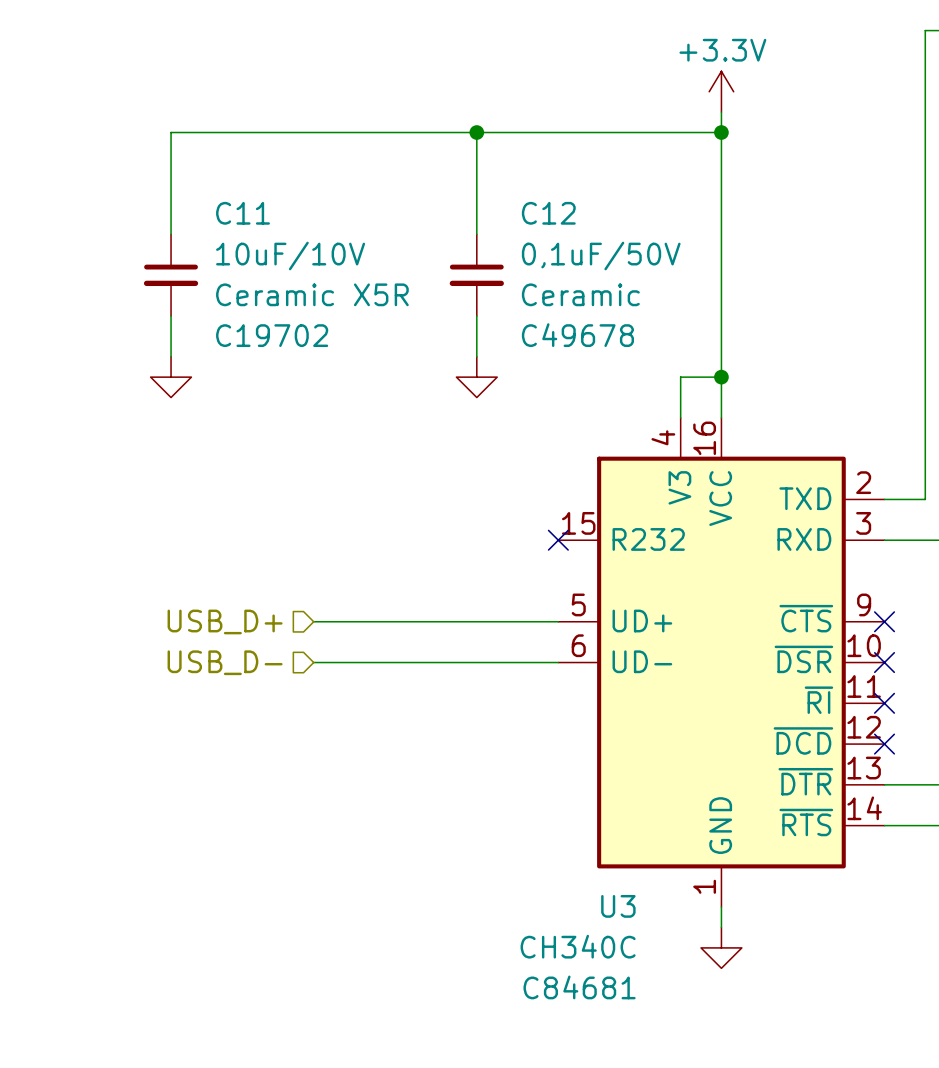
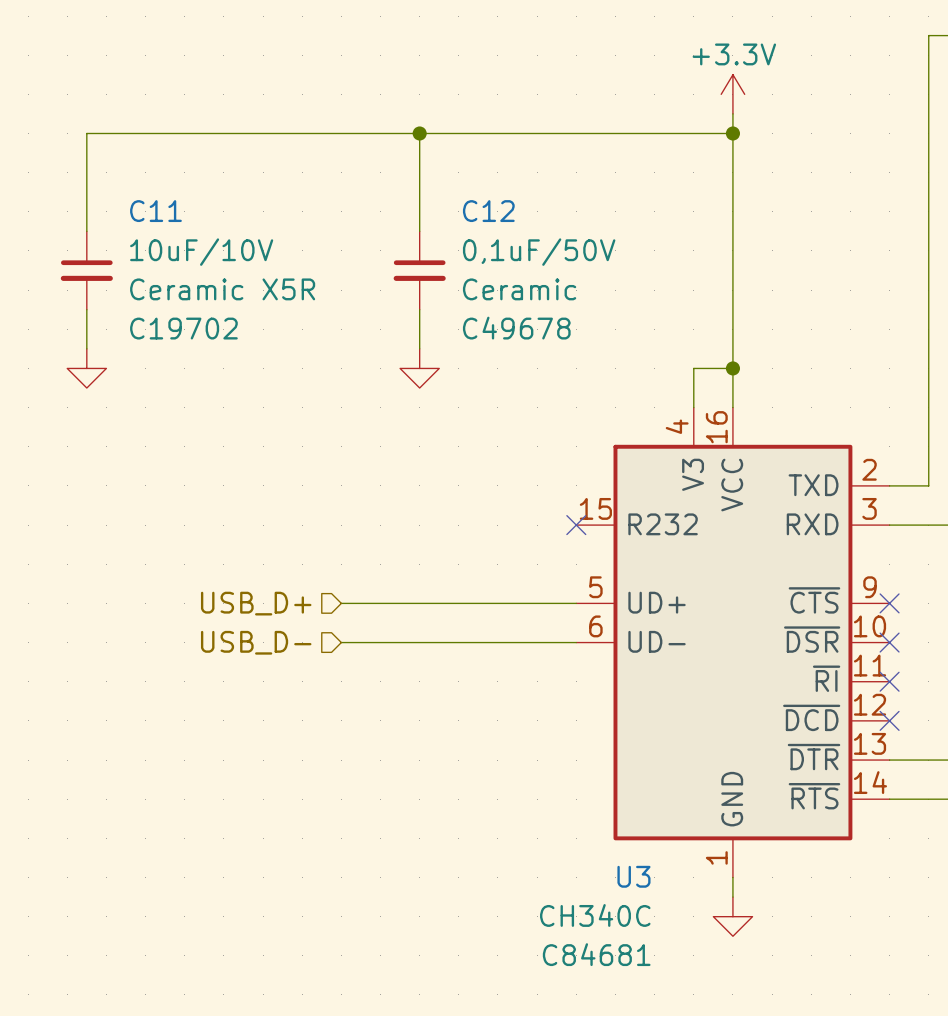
wire: (171, 132) (171, 234) -> (204, 133) (86, 133) (86, 231)
wire: (476, 132) (476, 234) -> (419, 133) (419, 231)
junction position: (476, 132) -> (419, 133)
C11 position: (171, 275) -> (86, 270)
C12 position: (476, 275) -> (419, 270)
wire: (171, 315) (171, 356) -> (86, 309) (86, 348)
wire: (476, 315) (476, 356) -> (419, 309) (419, 348)
power symbol: none -> (86, 368)
power symbol: (171, 377) -> none
power symbol position: (476, 377) -> (419, 368)

